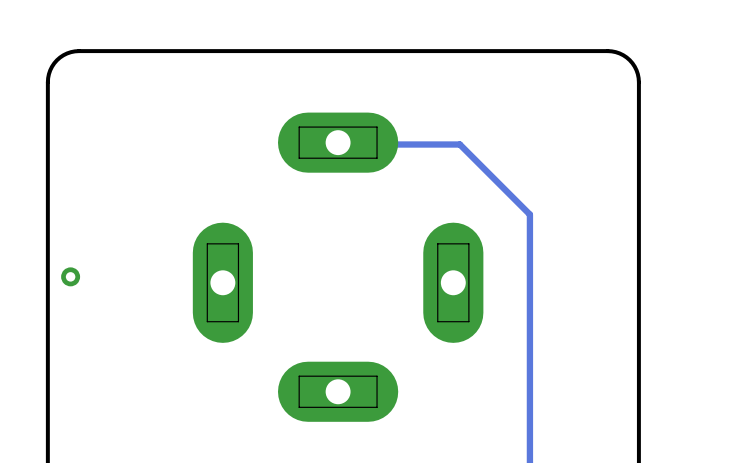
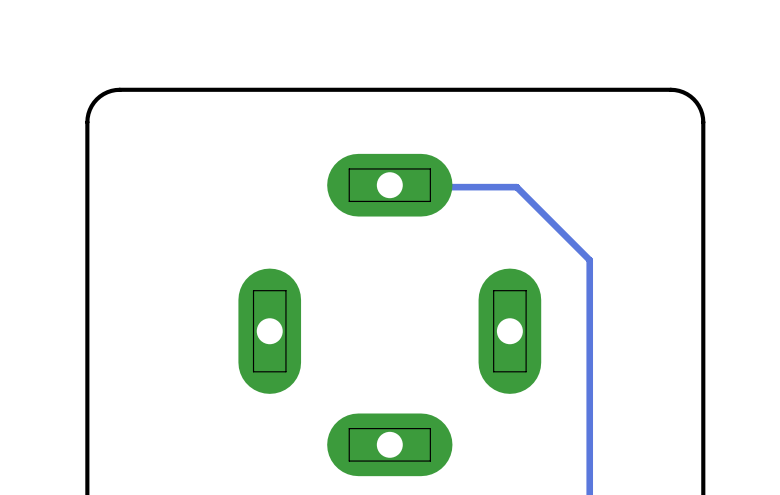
via: (70, 276) -> none

